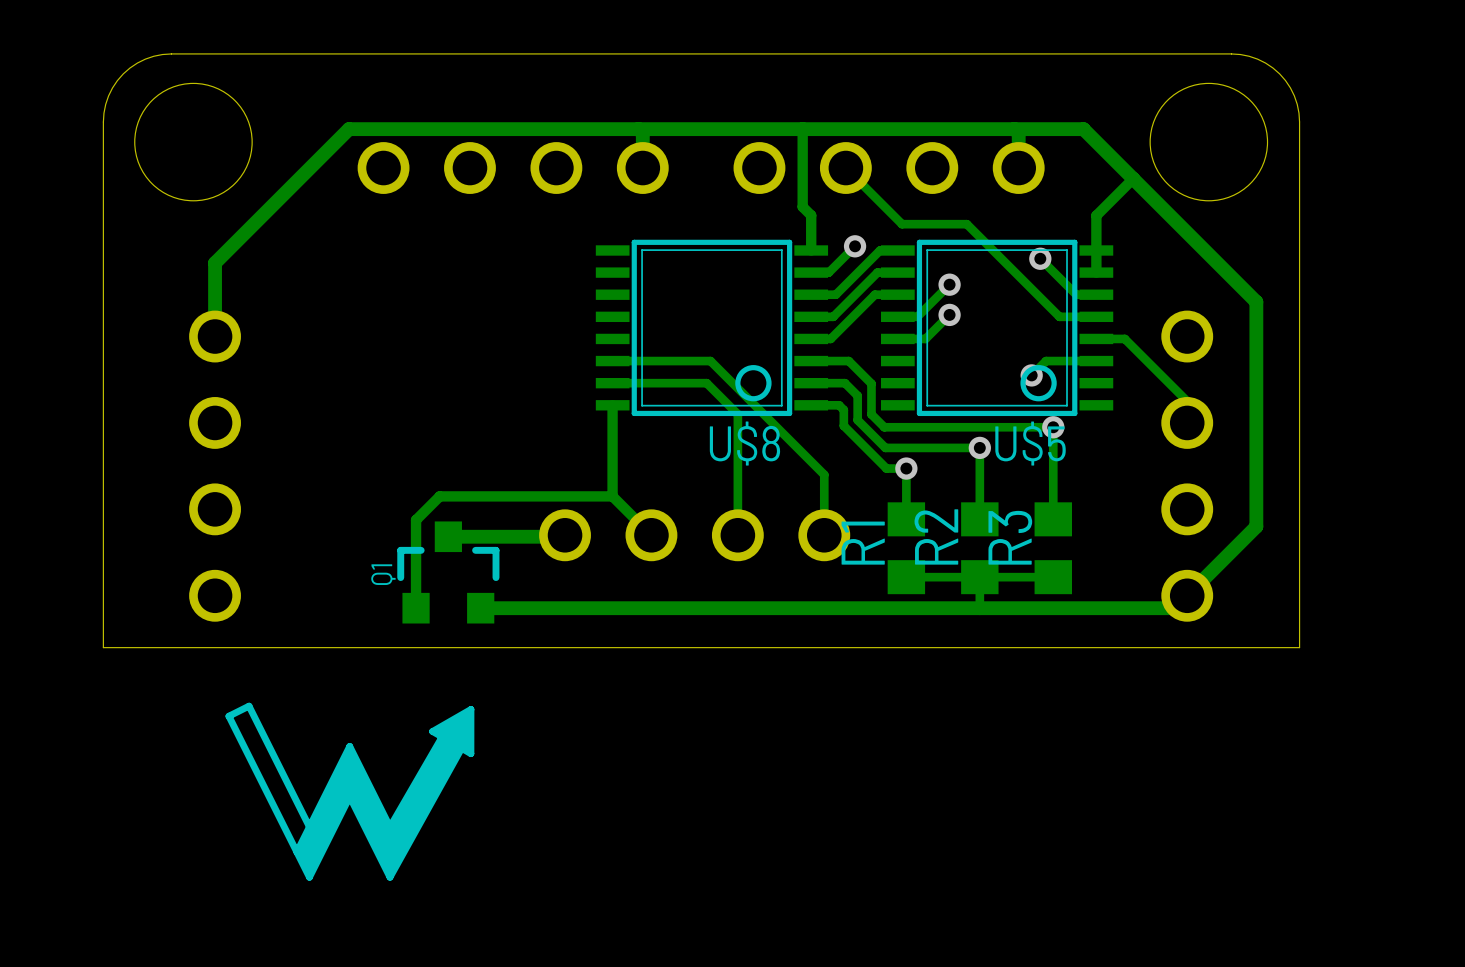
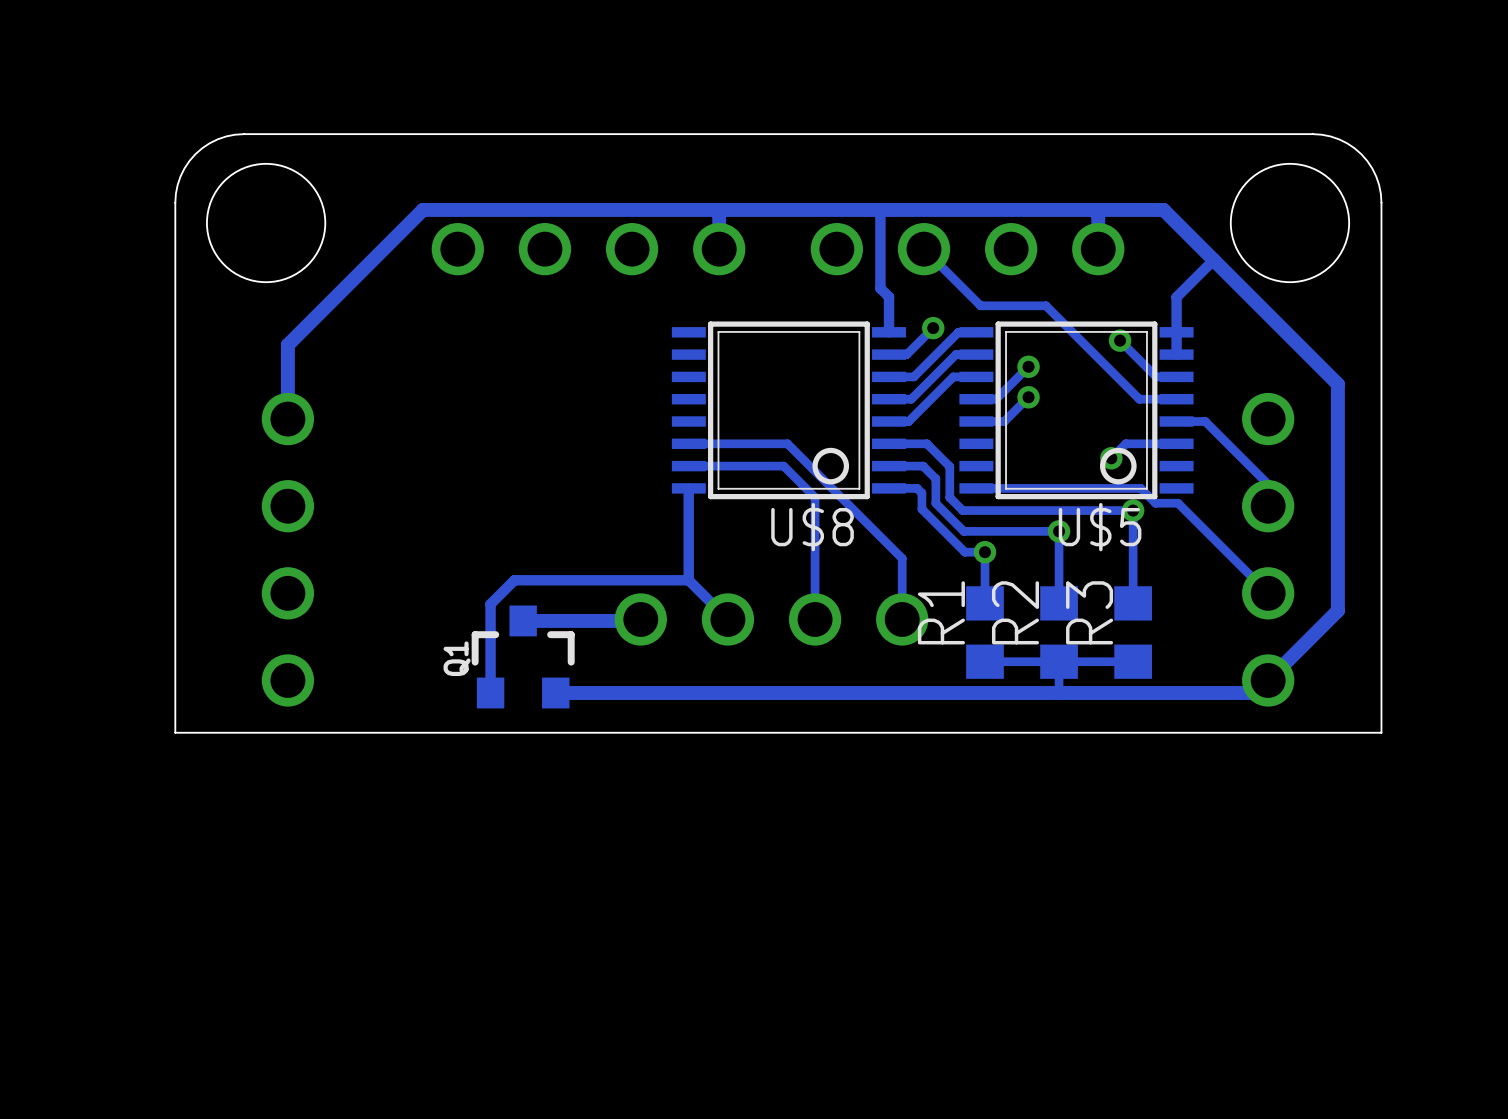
track: none -> (976, 488) (1140, 488) (1155, 503) (1178, 503) (1268, 593)
drawing: [225, 702, 475, 881] -> none

